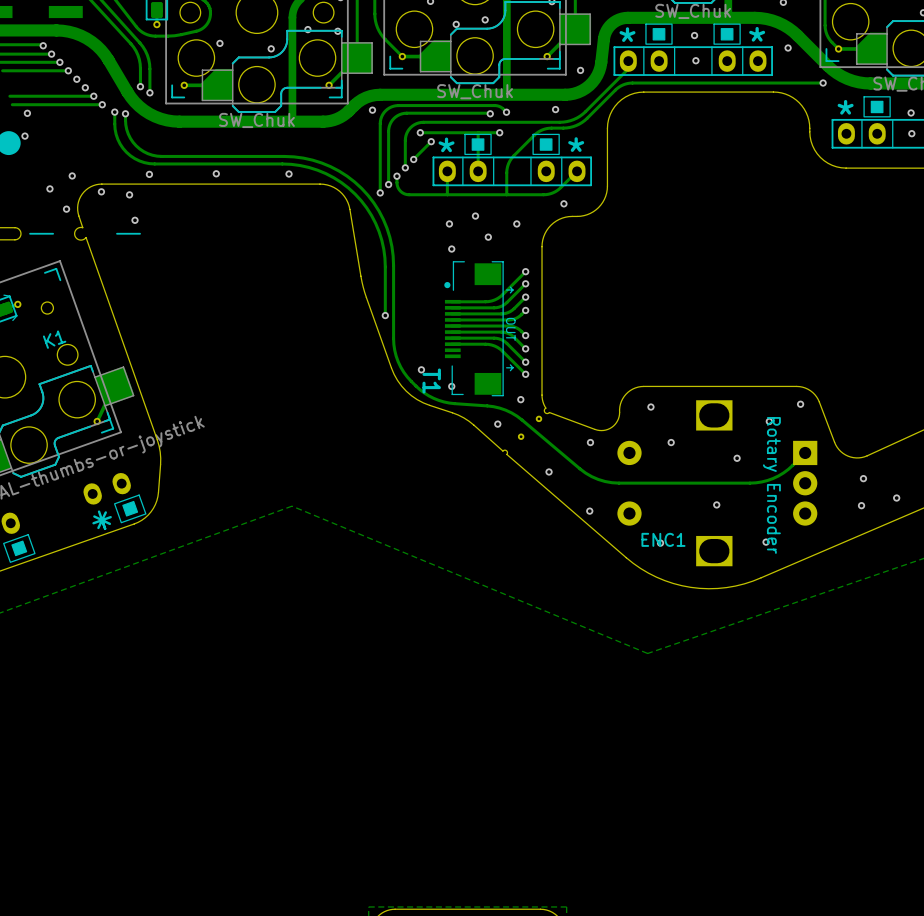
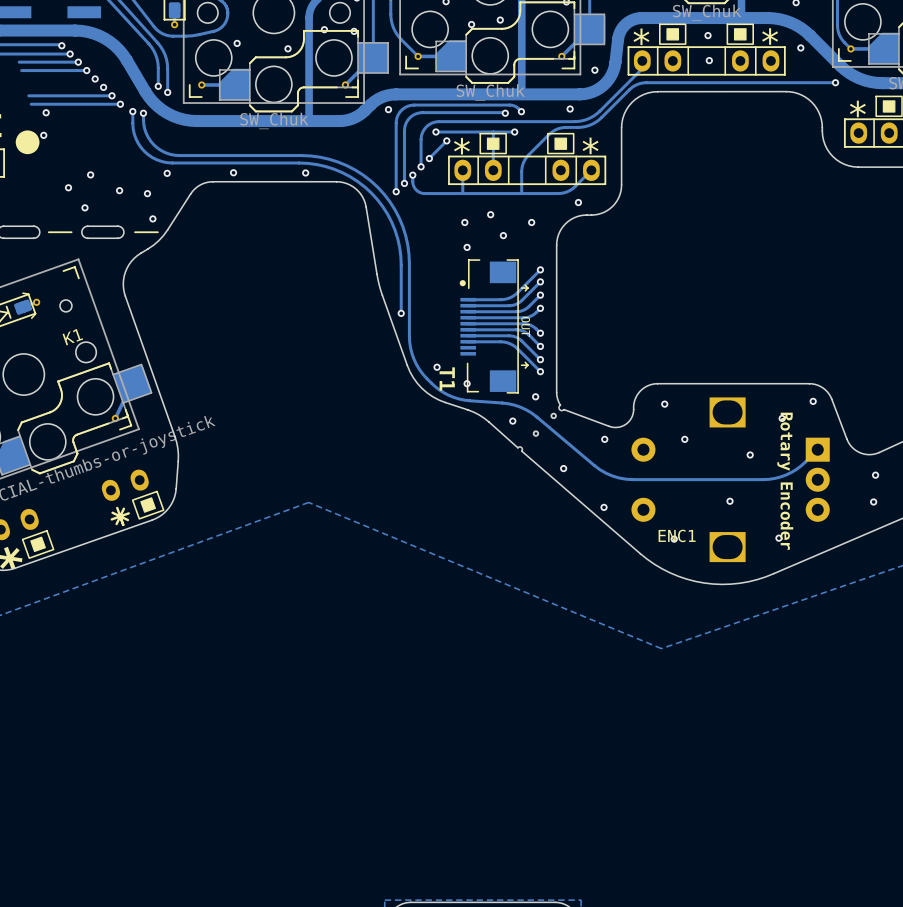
board edge: none -> (117, 226) (86, 226) (82, 228) (82, 233) (87, 238) (119, 238) (122, 235) (123, 231) (121, 227) (117, 226)
board edge: (360, 276) (349, 205) (342, 193) (330, 185) (320, 184) (101, 184) (93, 185) (86, 189) (79, 199) (77, 207) (82, 227) (76, 229) (74, 235) (79, 239) (86, 237) (157, 439) -> (377, 274) (365, 203) (358, 191) (350, 184) (336, 181) (212, 181) (197, 186) (163, 235) (131, 261) (123, 279) (125, 296) (175, 436)

